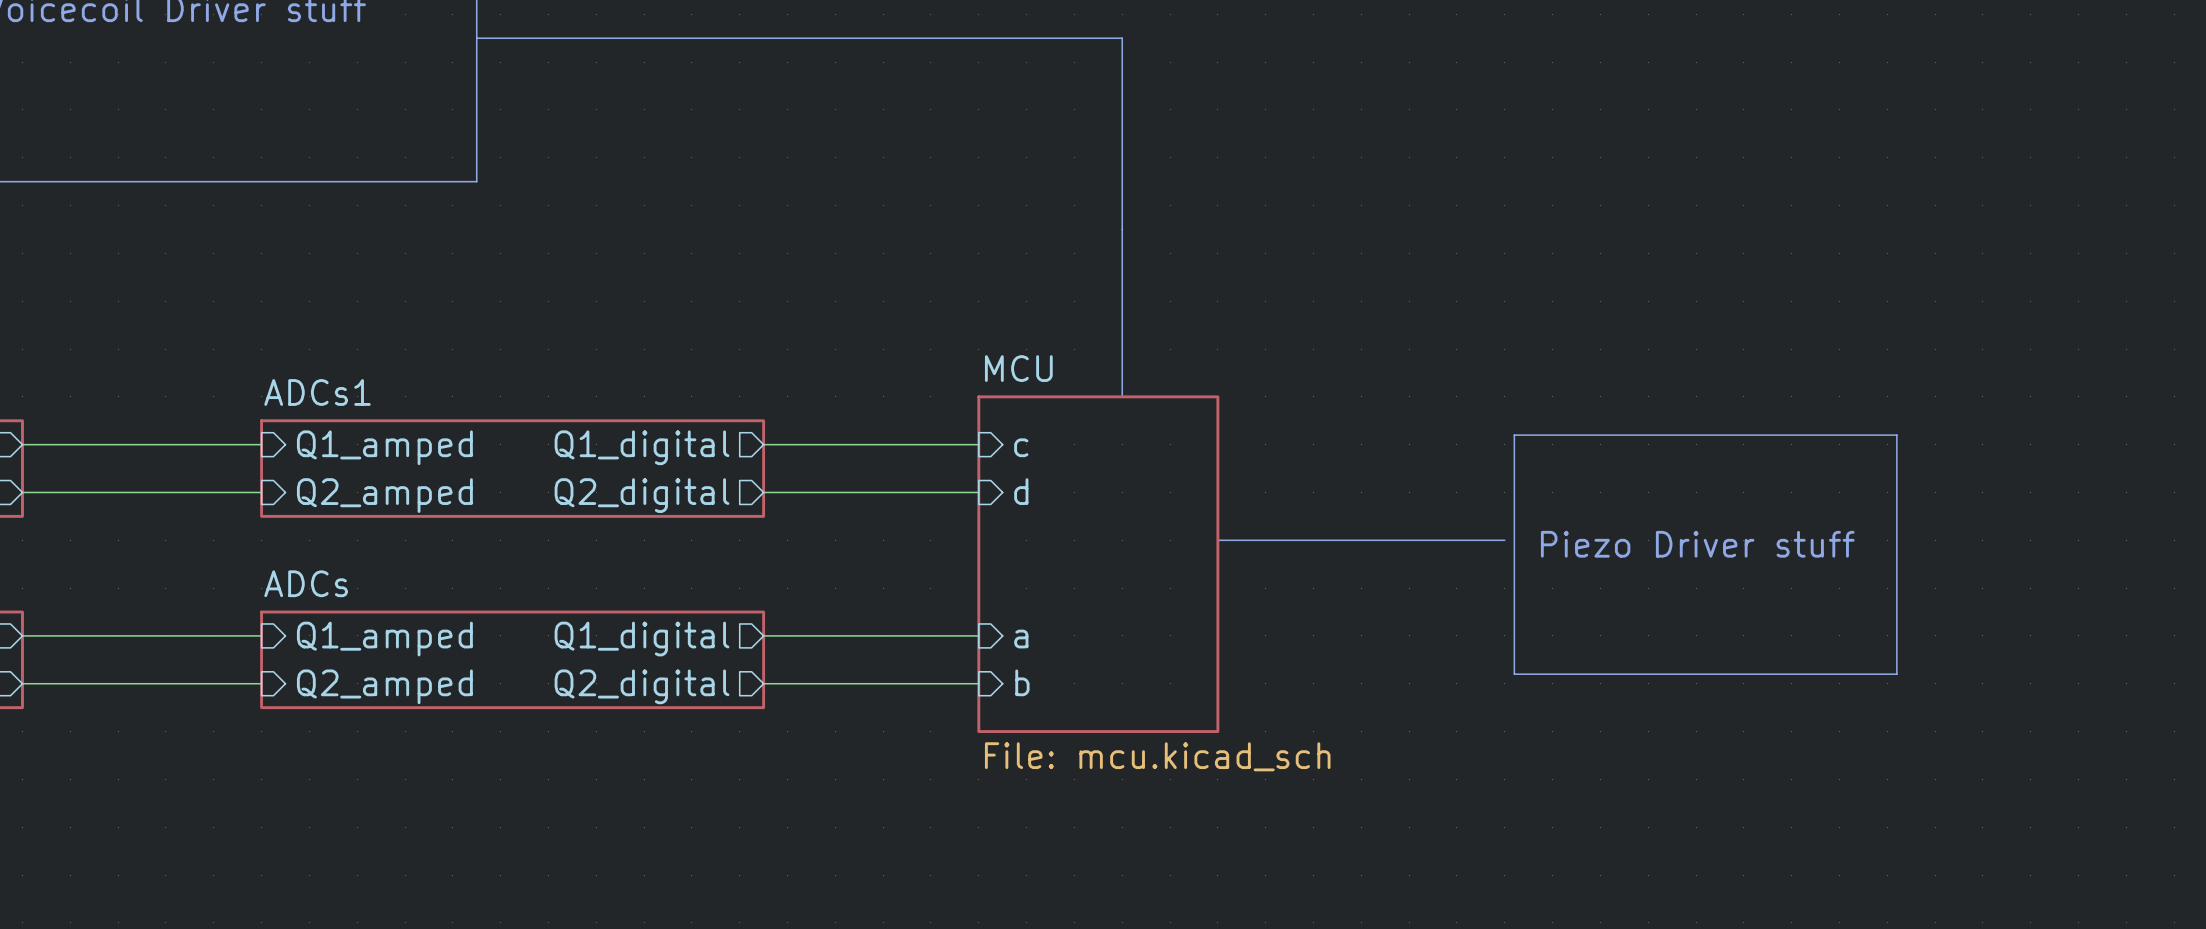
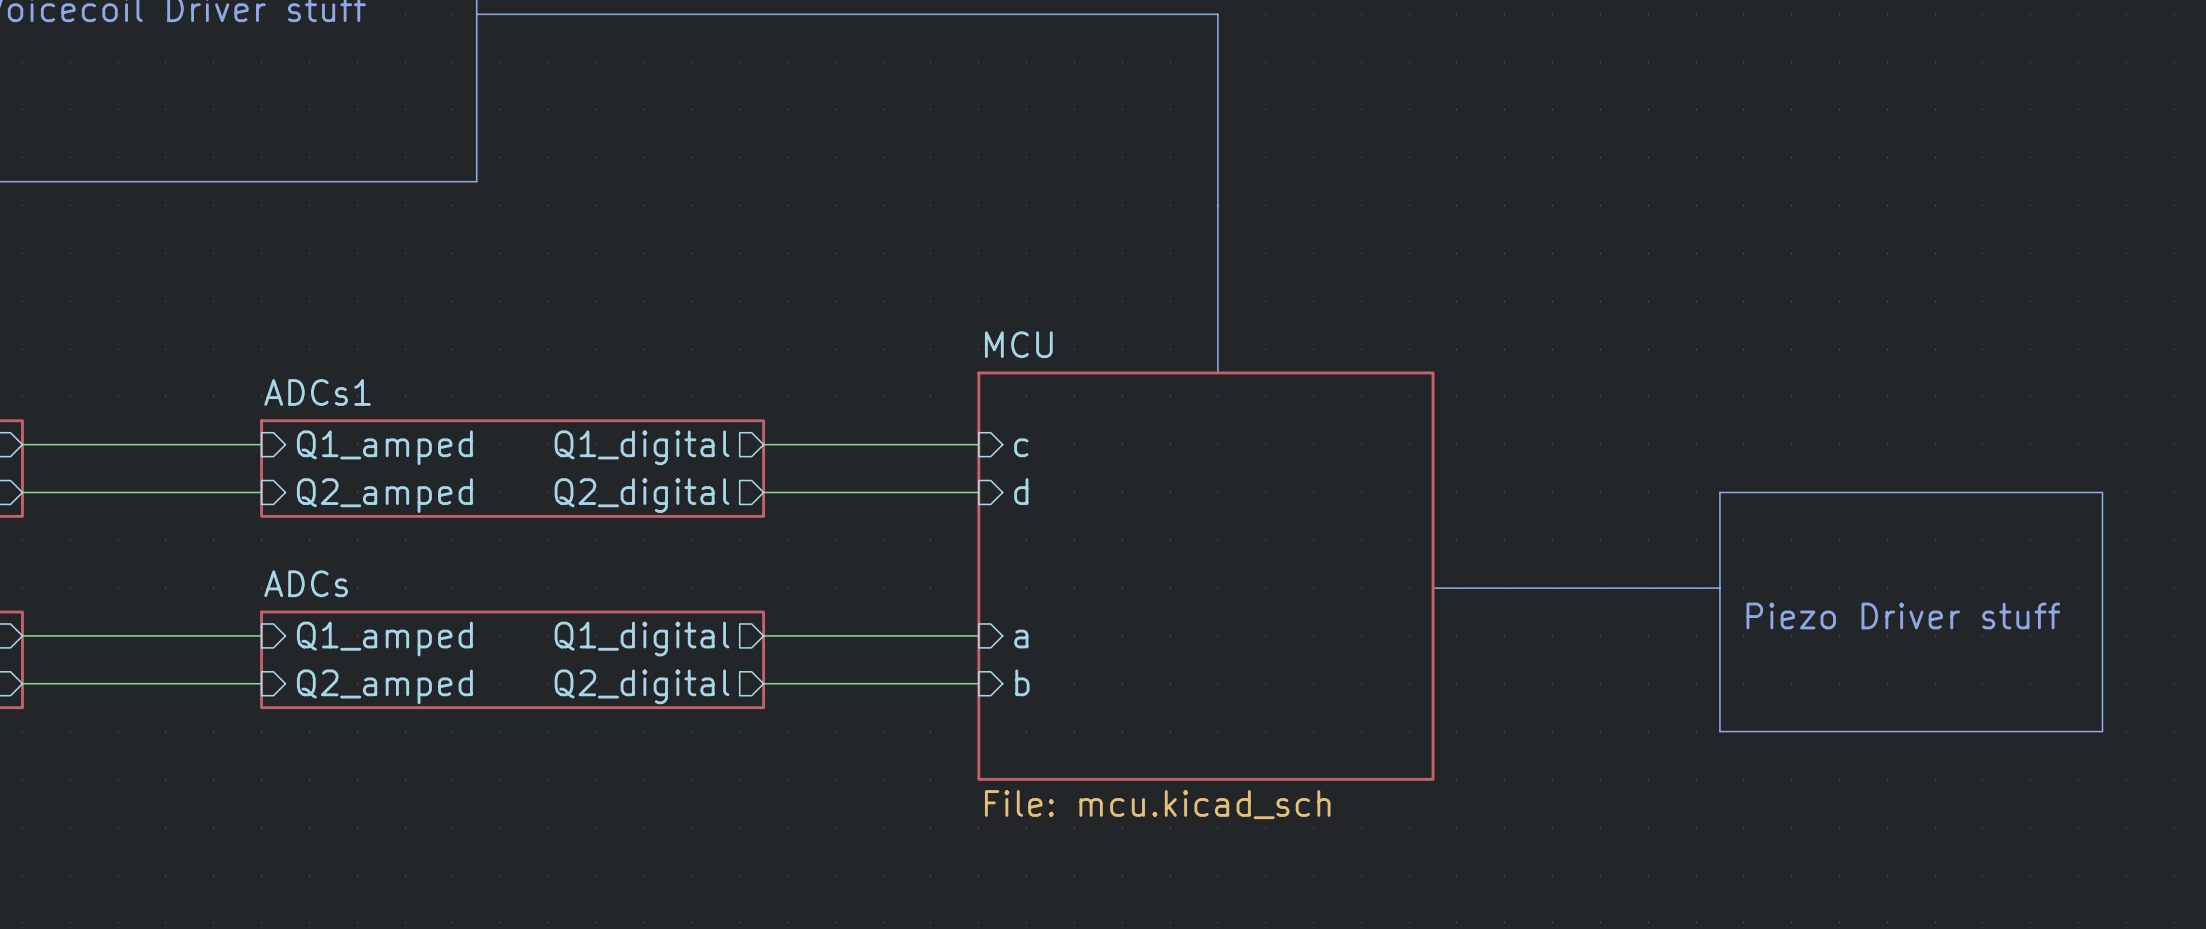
line: none -> (476, 14) (1217, 14) (1217, 372)
line: (476, 38) (1122, 38) (1122, 396) -> none
line: (1514, 435) (1896, 435) (1896, 674) (1514, 674) (1514, 435) -> (1719, 492) (2102, 492) (2102, 731) (1719, 731) (1719, 492)
line: (1217, 540) (1504, 540) -> (1433, 588) (1719, 588)
text position: Piezo Driver stuff (1697, 544) -> Piezo Driver stuff (1903, 615)
sheet MCU: File: mcu.kicad_sch (1098, 564) -> none
sheet MCU: none -> File: mcu.kicad_sch (1205, 576)

